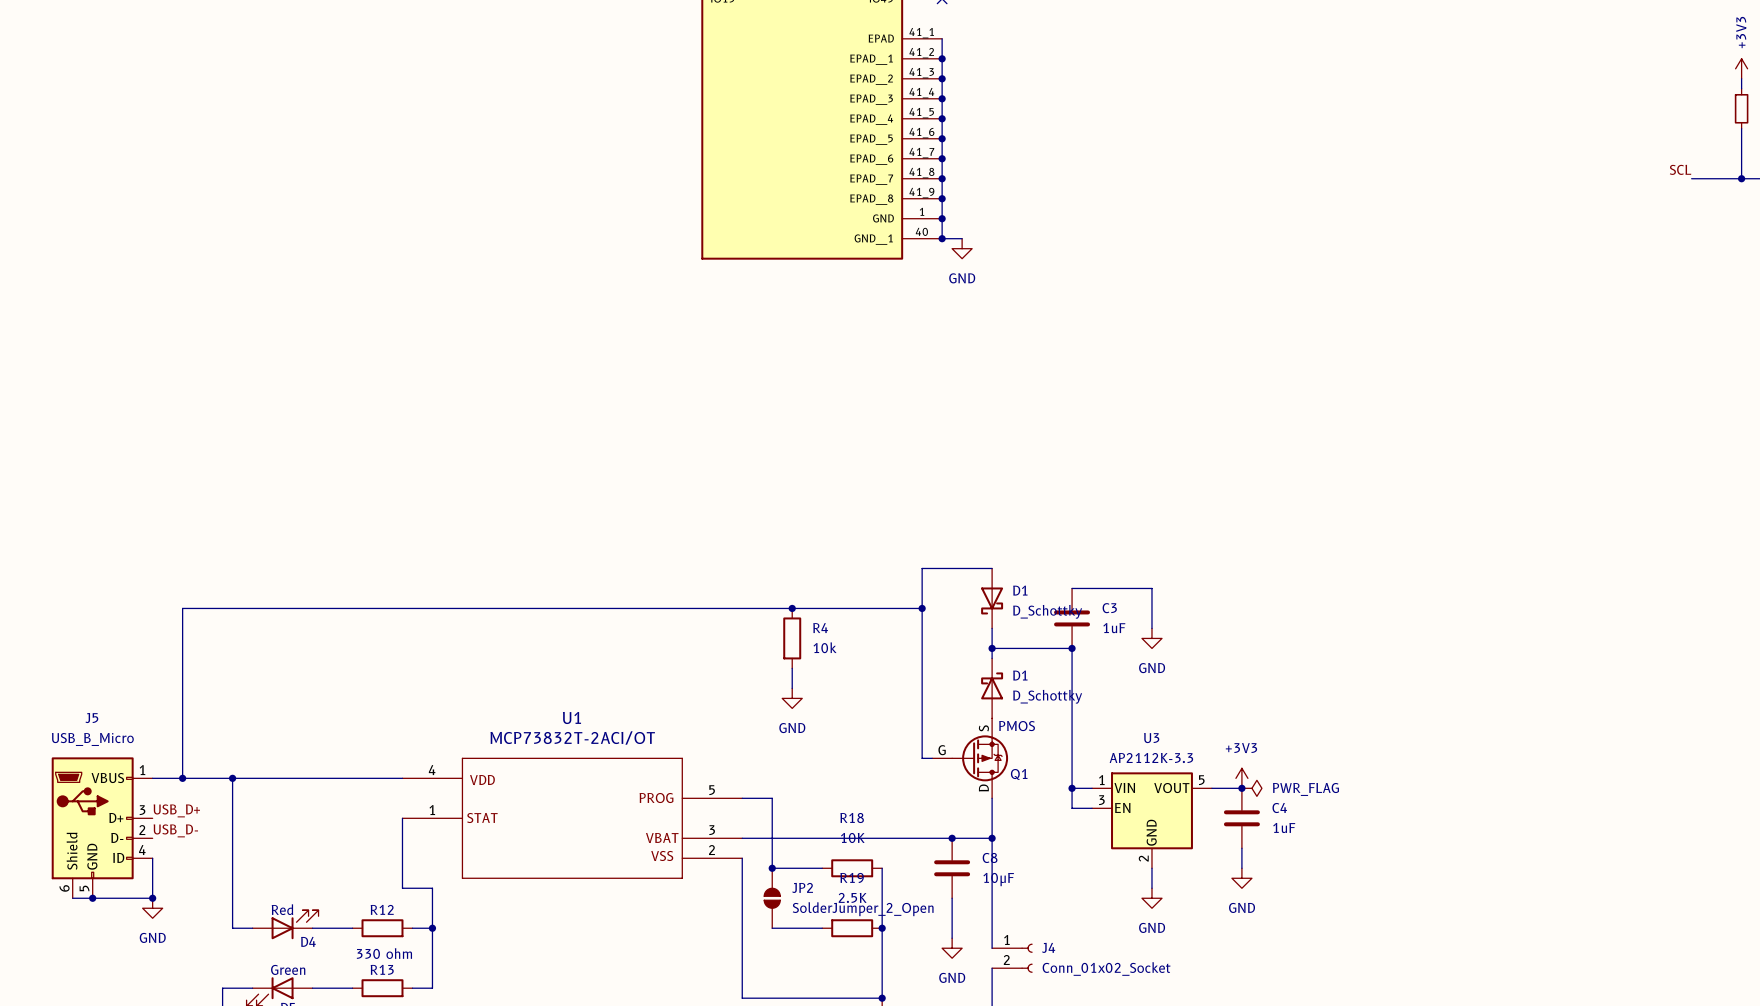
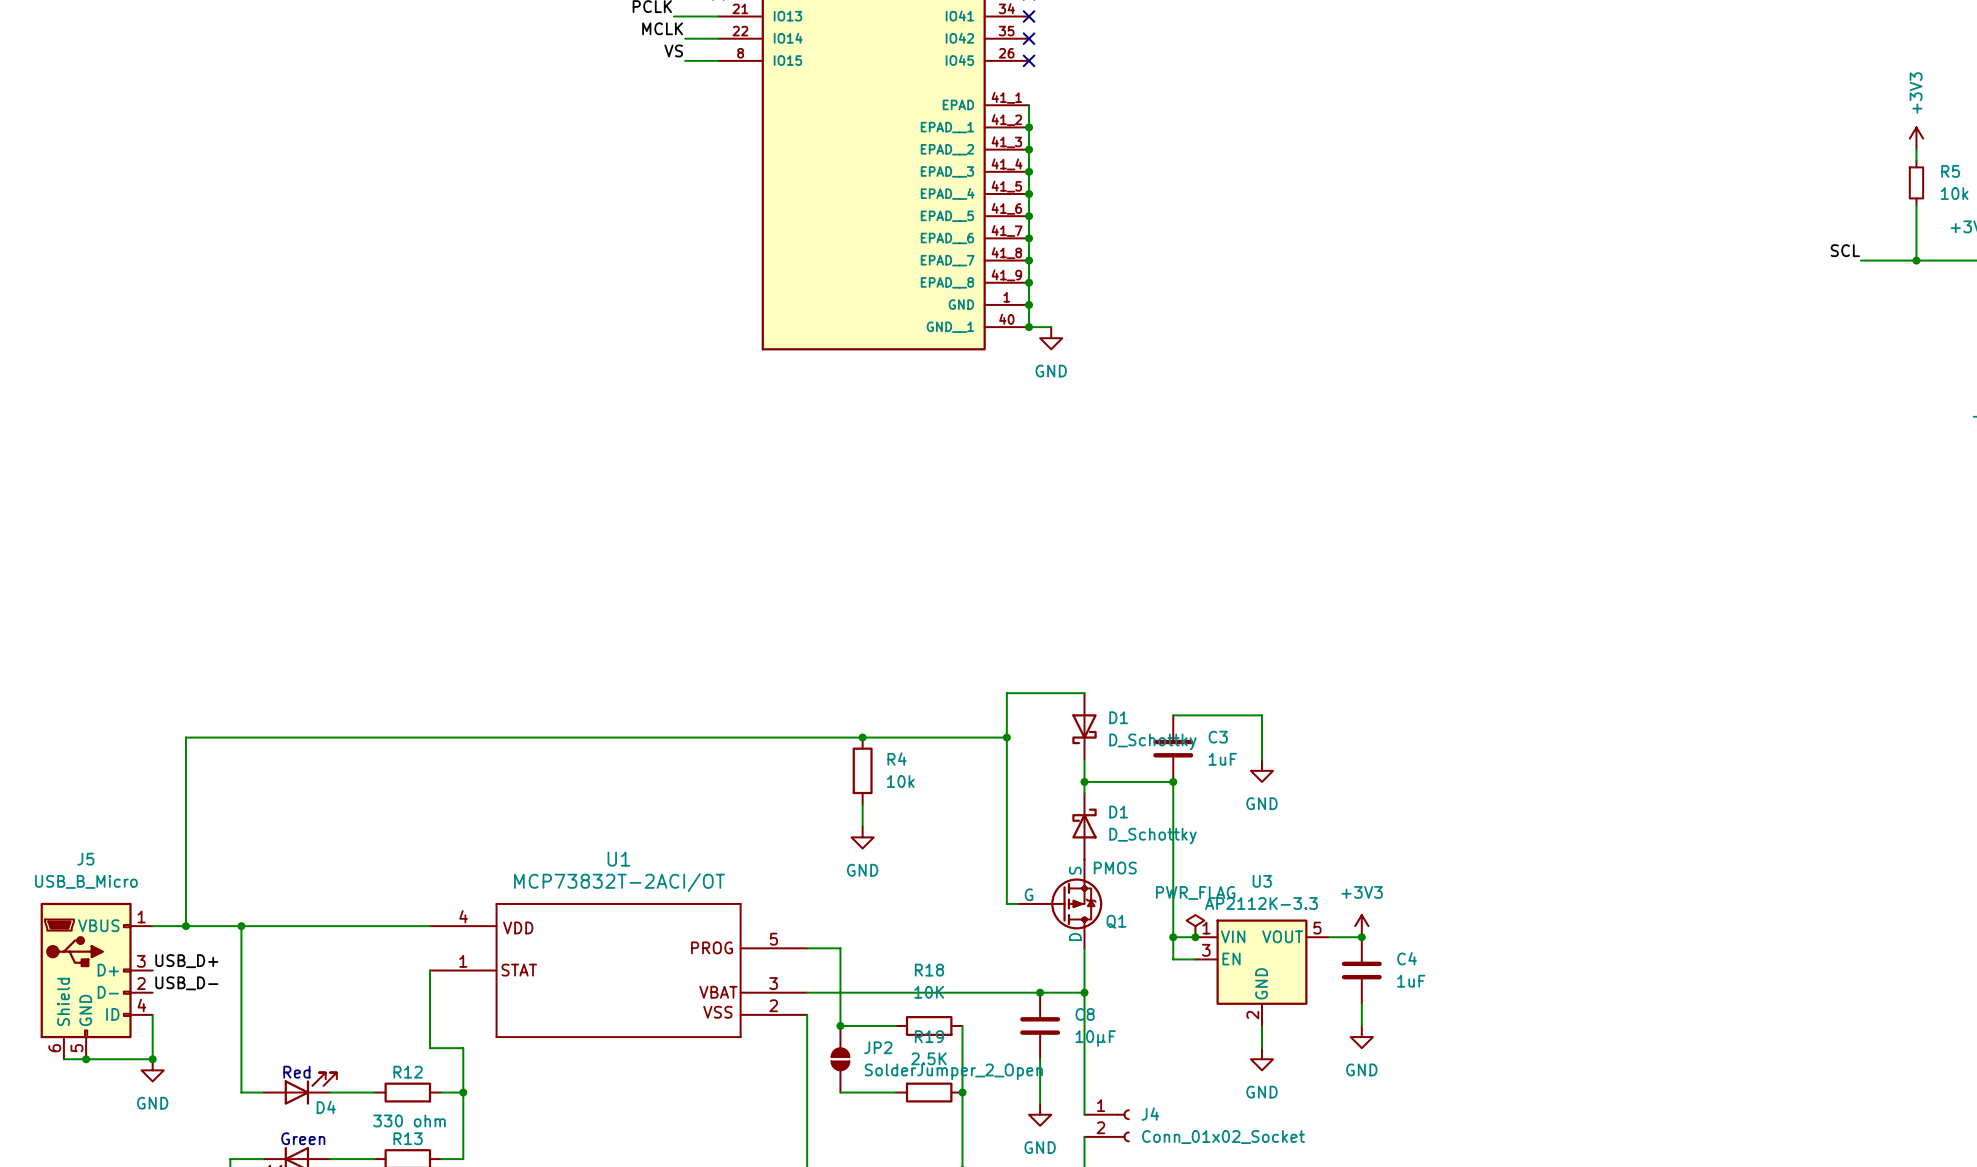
junction: none -> (1195, 937)
power symbol rotation: 0° (1251, 788) -> 90° counterclockwise (1195, 926)
power symbol position: PWR_FLAG (1251, 788) -> PWR_FLAG (1195, 926)
power symbol text position: PWR_FLAG (1305, 789) -> PWR_FLAG (1195, 892)

